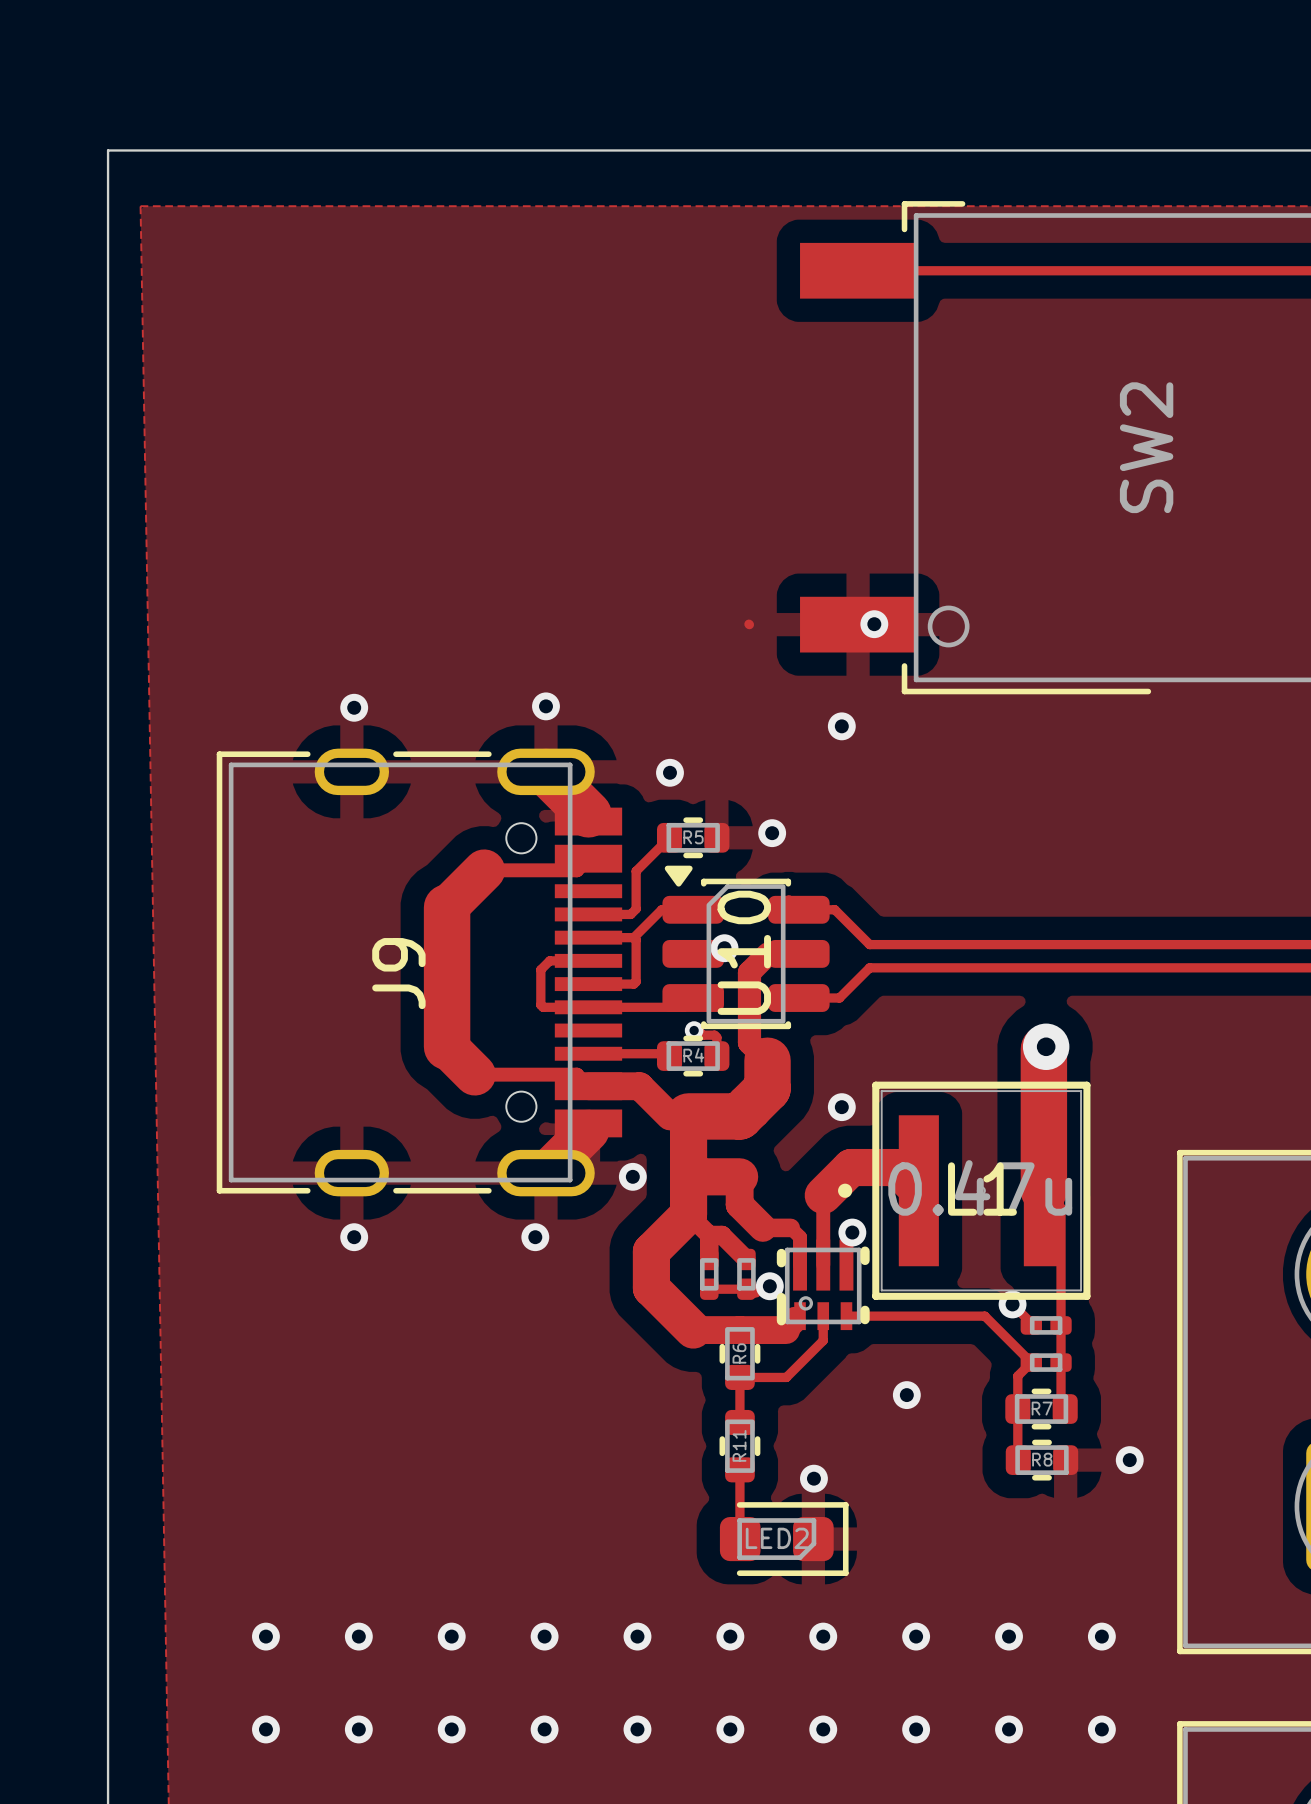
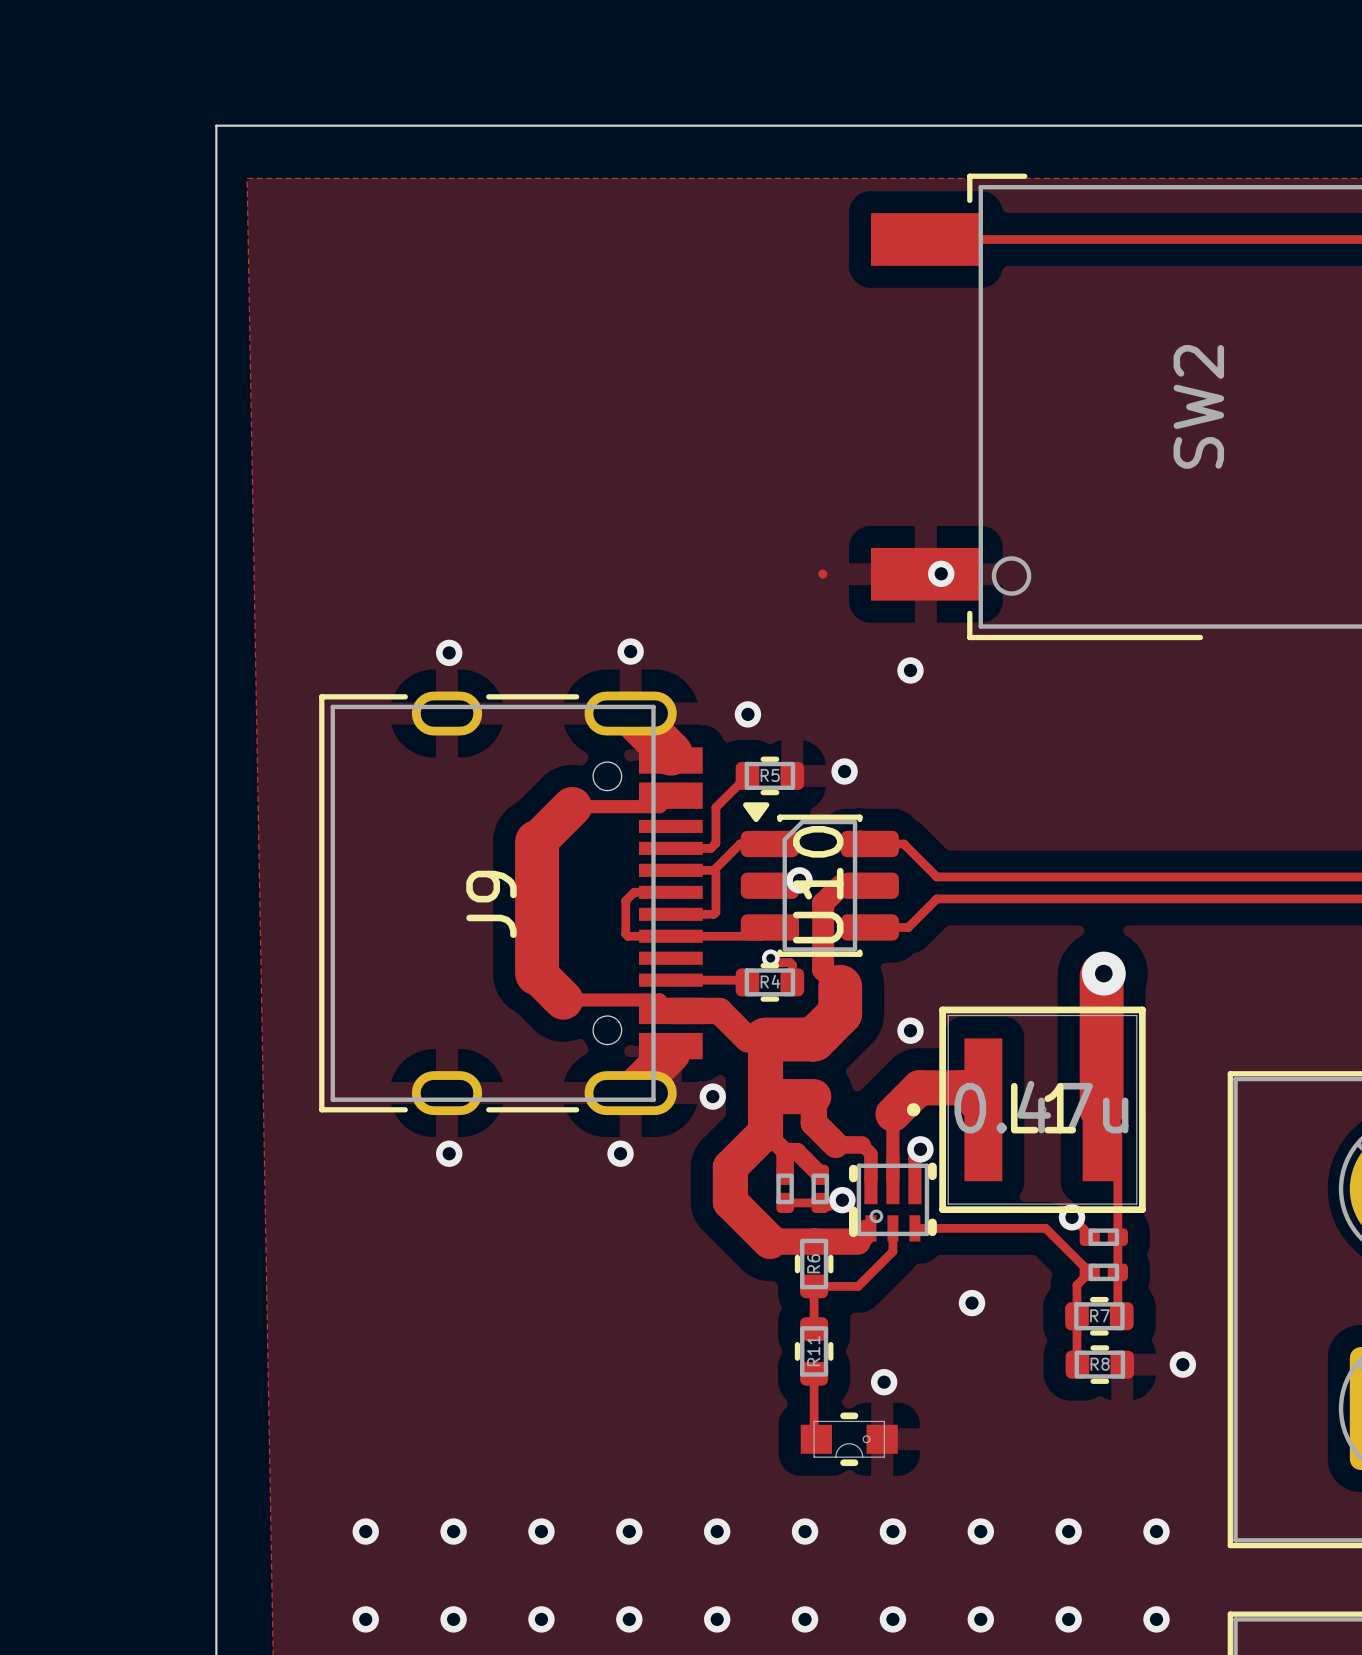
part: none -> (849, 1439)
LED2: (784, 1539) -> none

